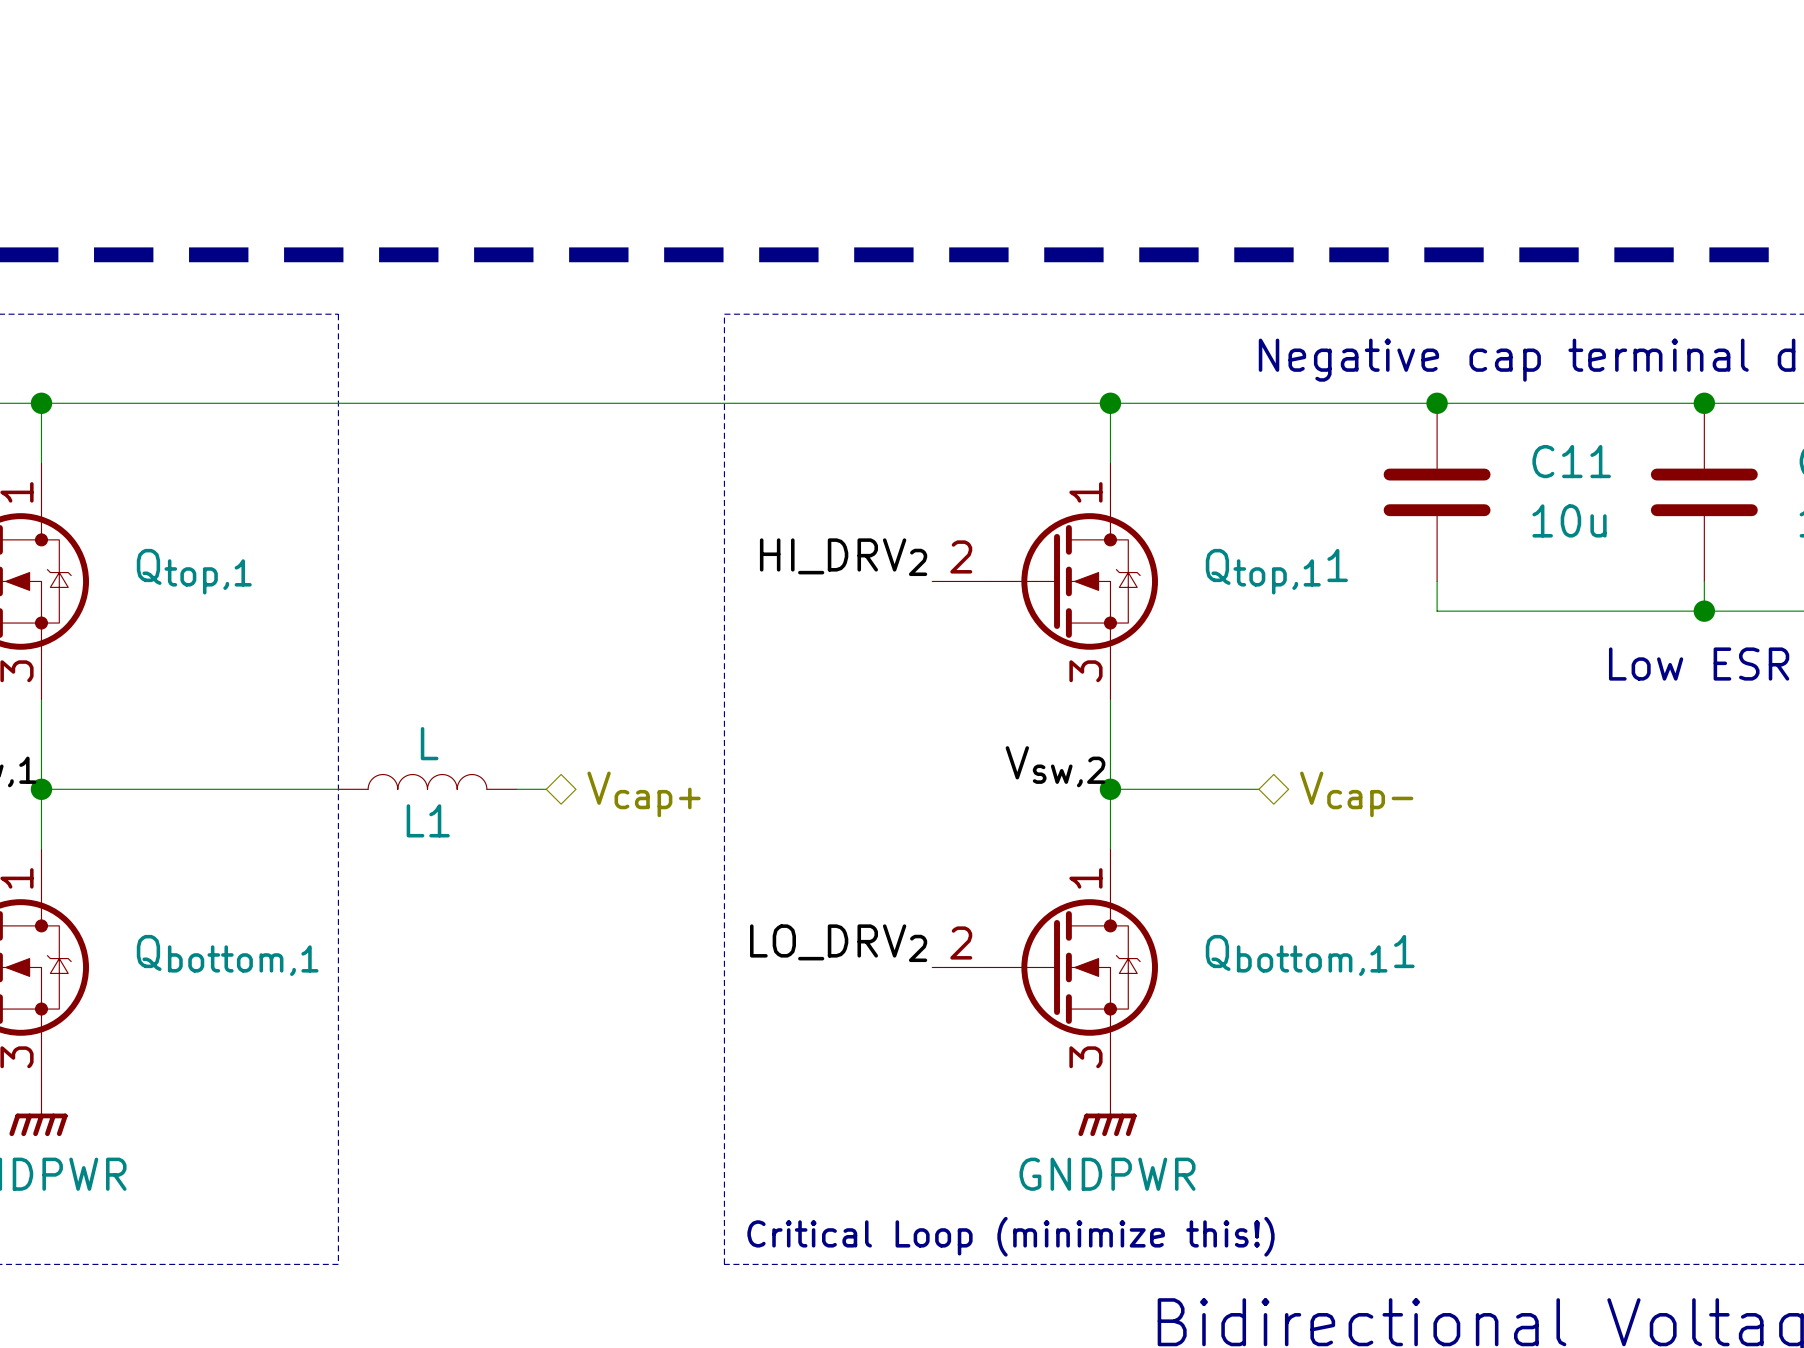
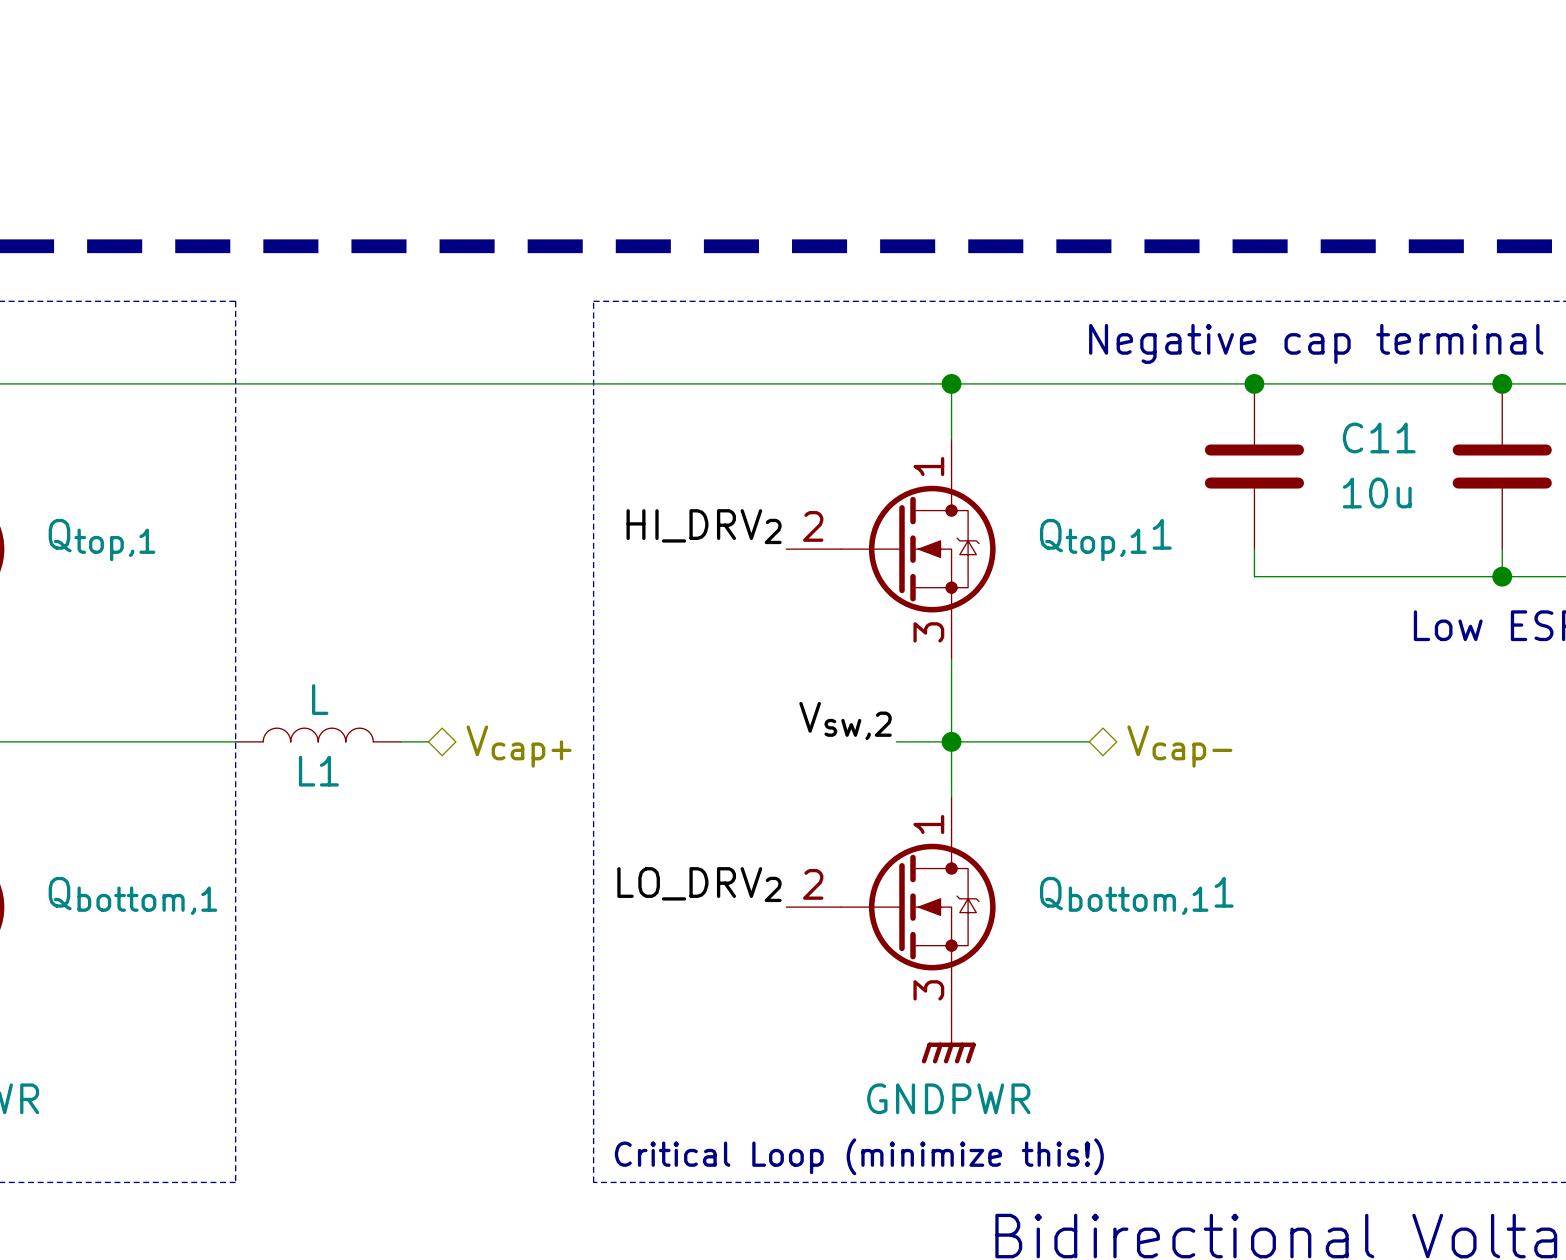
label position: Vsw,2 (1055, 766) -> Vsw,2 (845, 720)
wire: none -> (896, 741) (951, 741)

